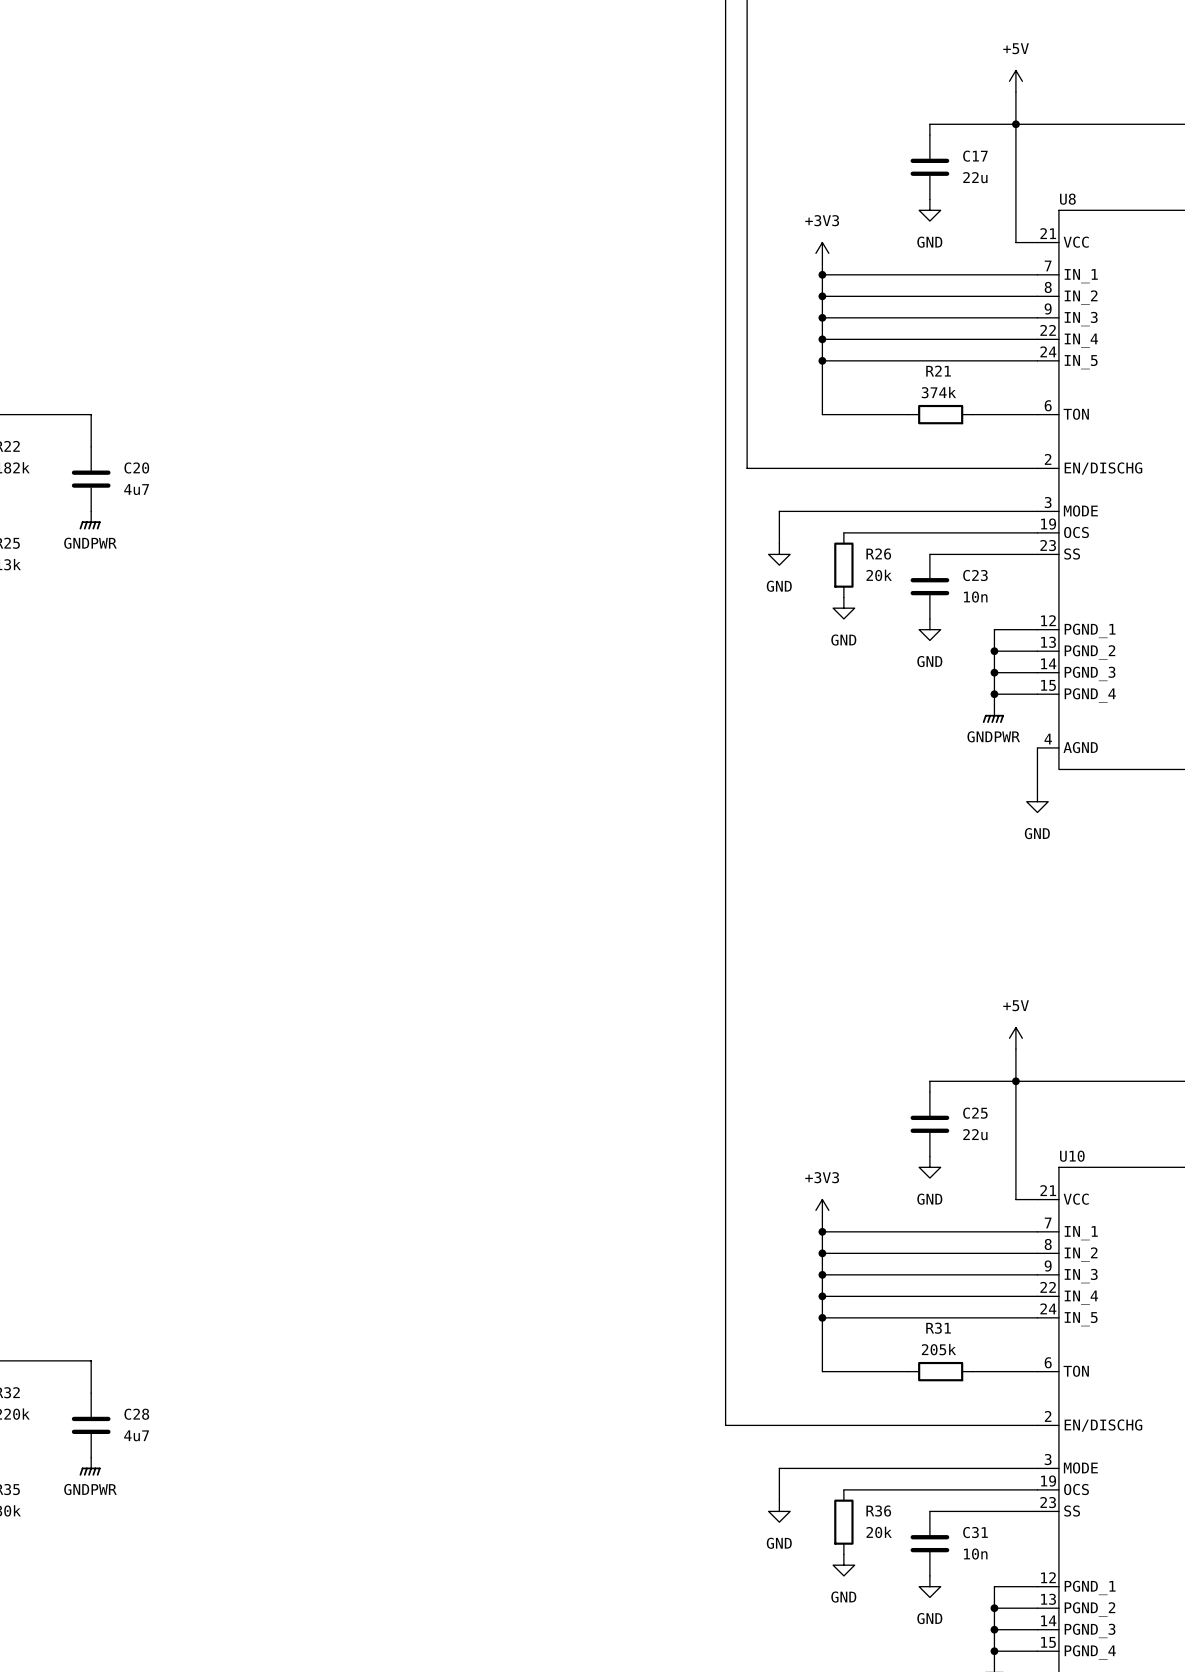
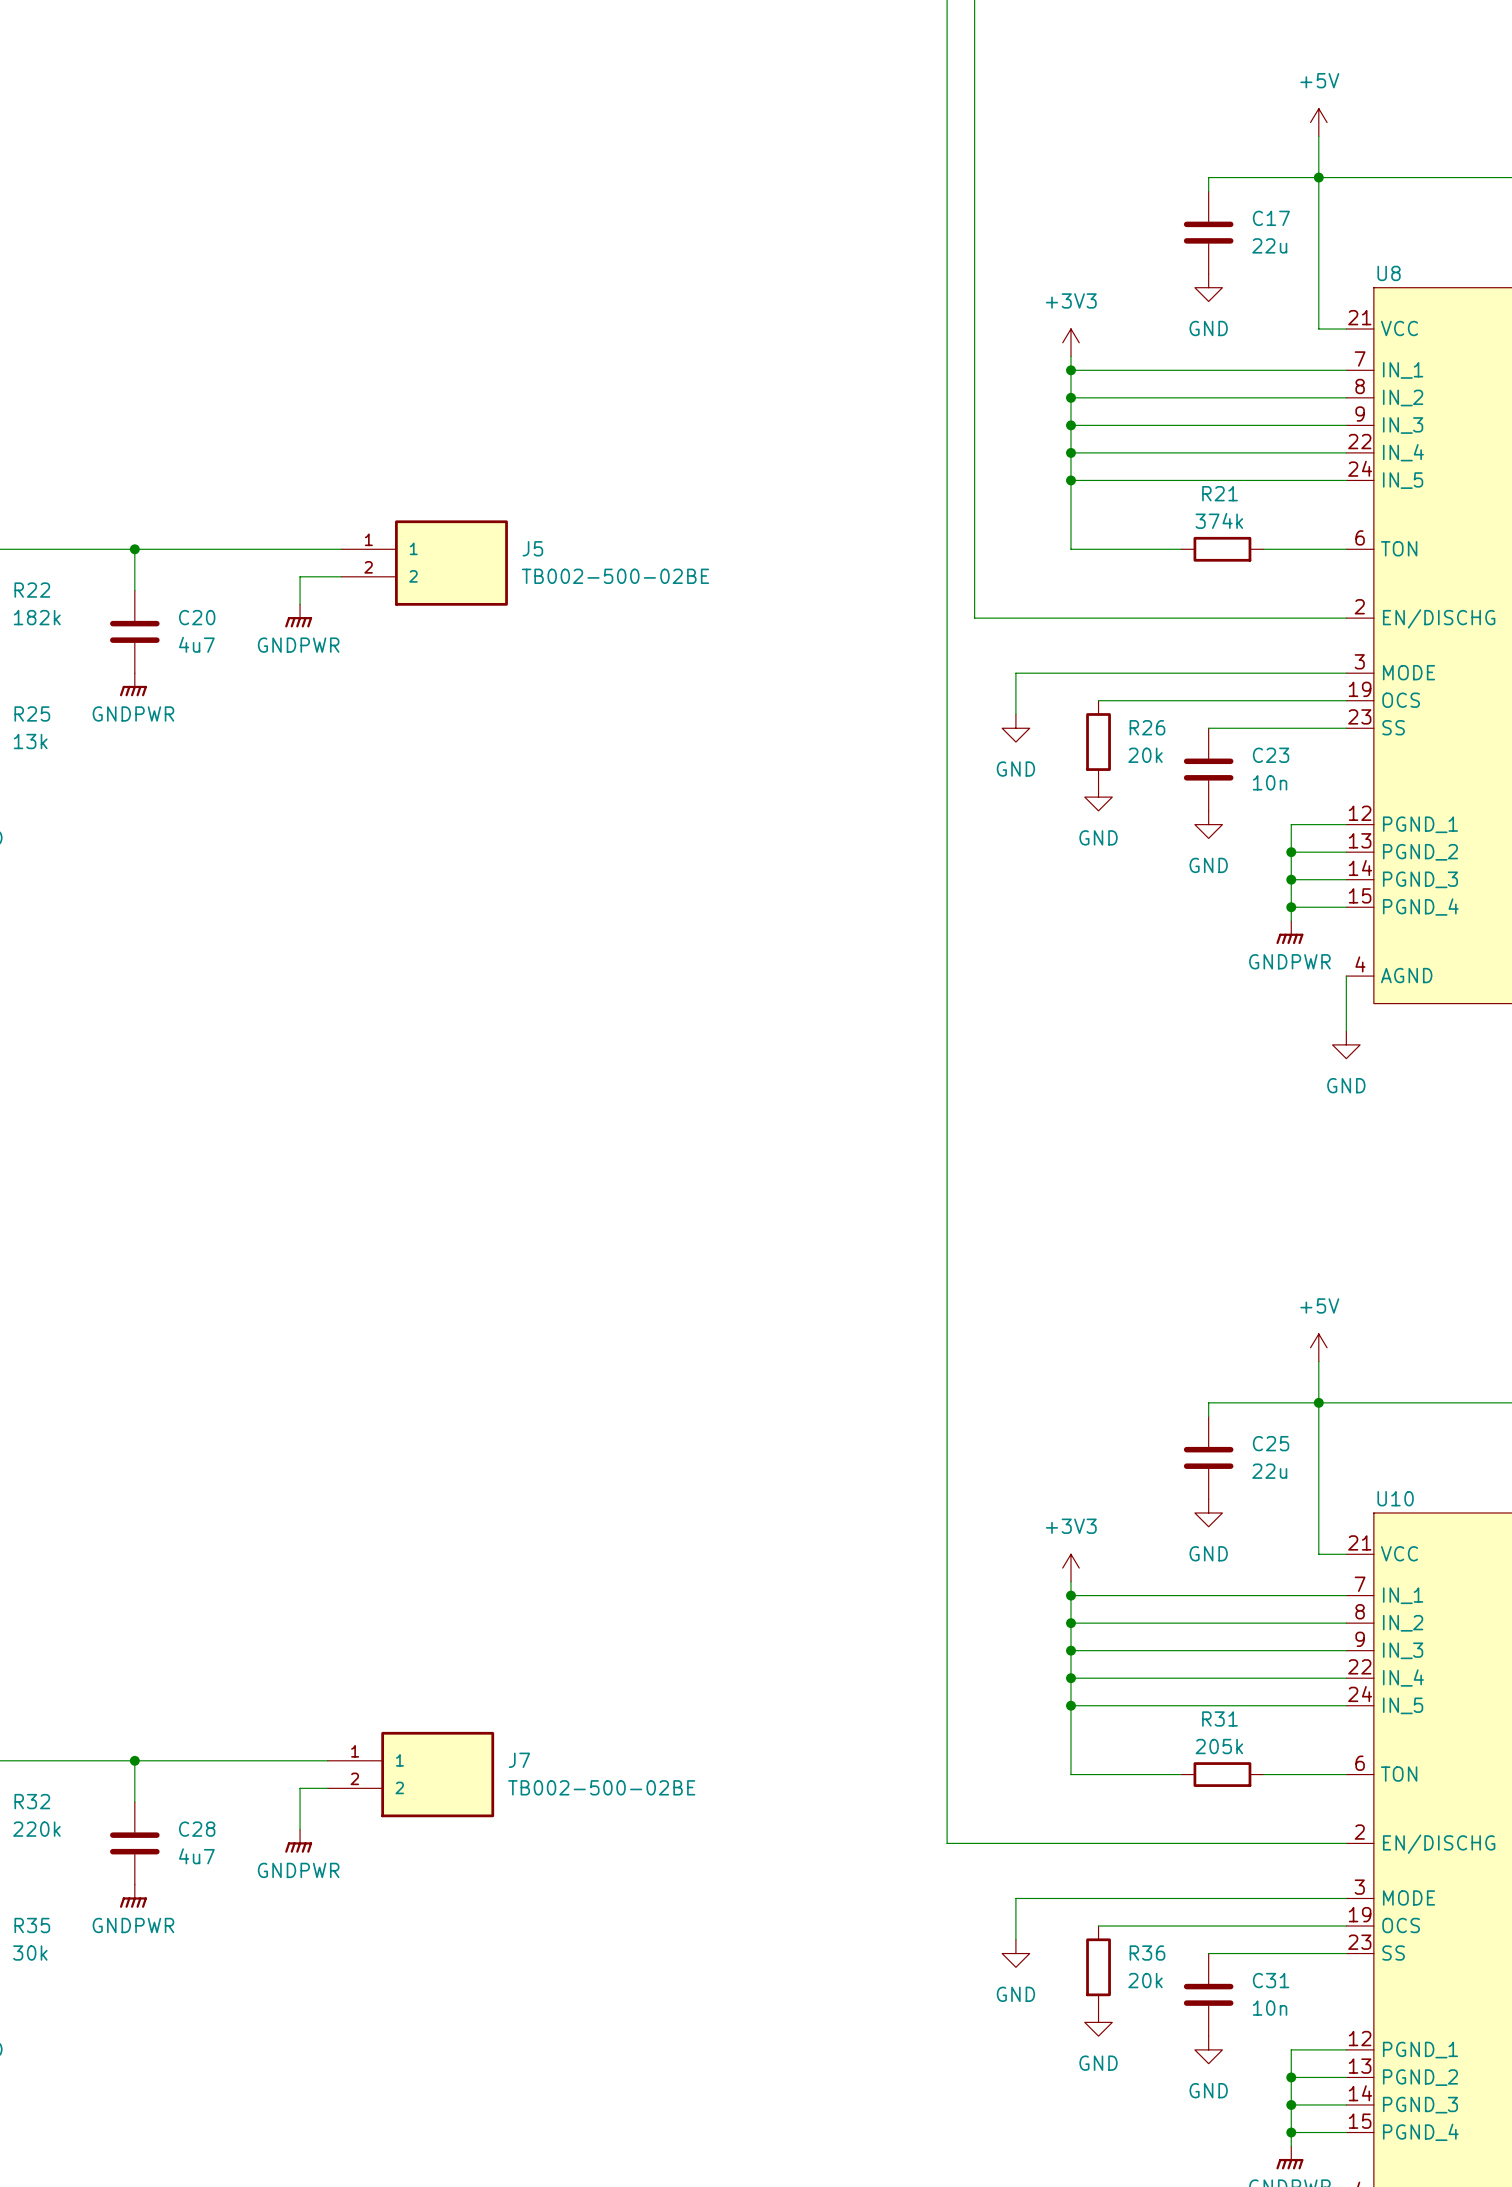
wire: none -> (134, 549) (341, 549)
junction: none -> (134, 549)
J5: none -> TB002-500-02BE (424, 563)
wire: none -> (341, 576) (300, 576) (300, 604)
power symbol: none -> GNDPWR (298, 615)
wire: none -> (134, 1760) (327, 1760)
junction: none -> (134, 1760)
J7: none -> TB002-500-02BE (410, 1774)
wire: none -> (327, 1788) (300, 1788) (300, 1829)
power symbol: none -> GNDPWR (298, 1841)

